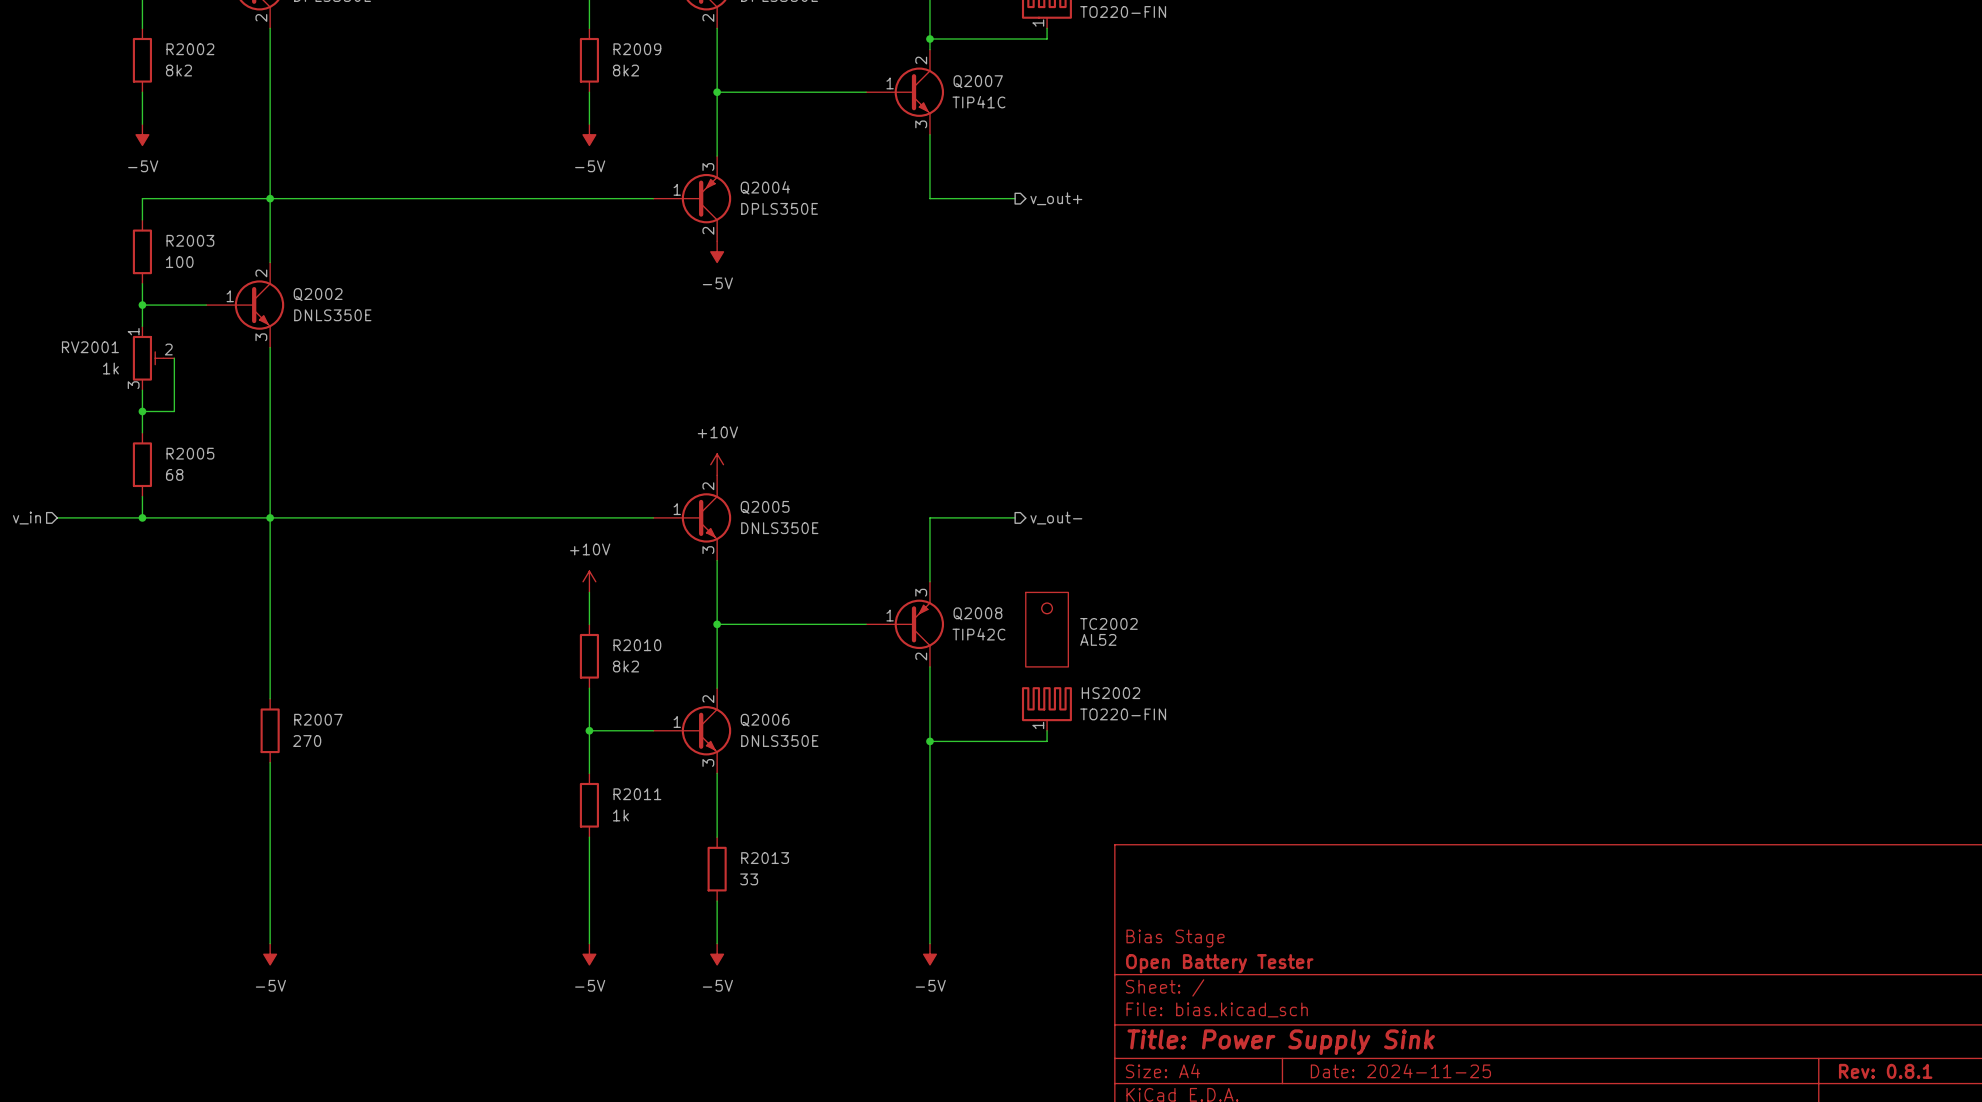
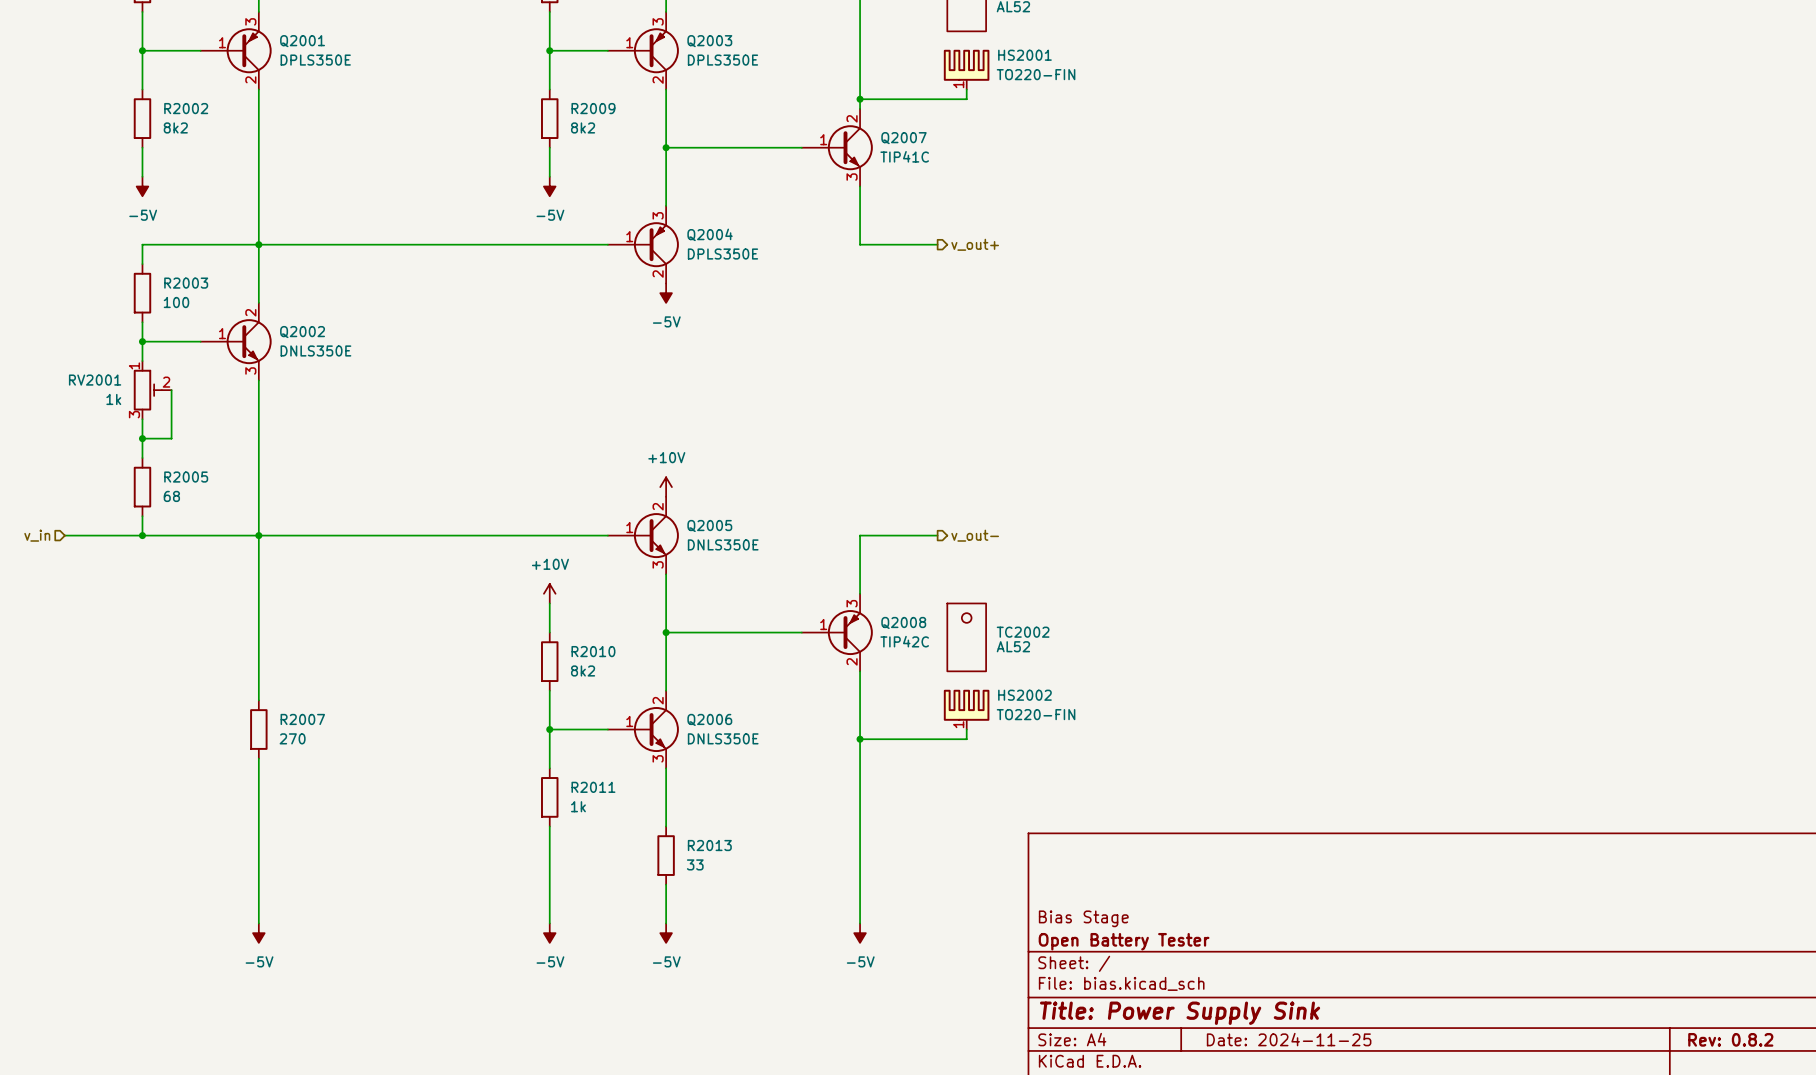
title block: Rev: 0.8.1 (1885, 1071) -> Rev: 0.8.2 (1730, 1039)

